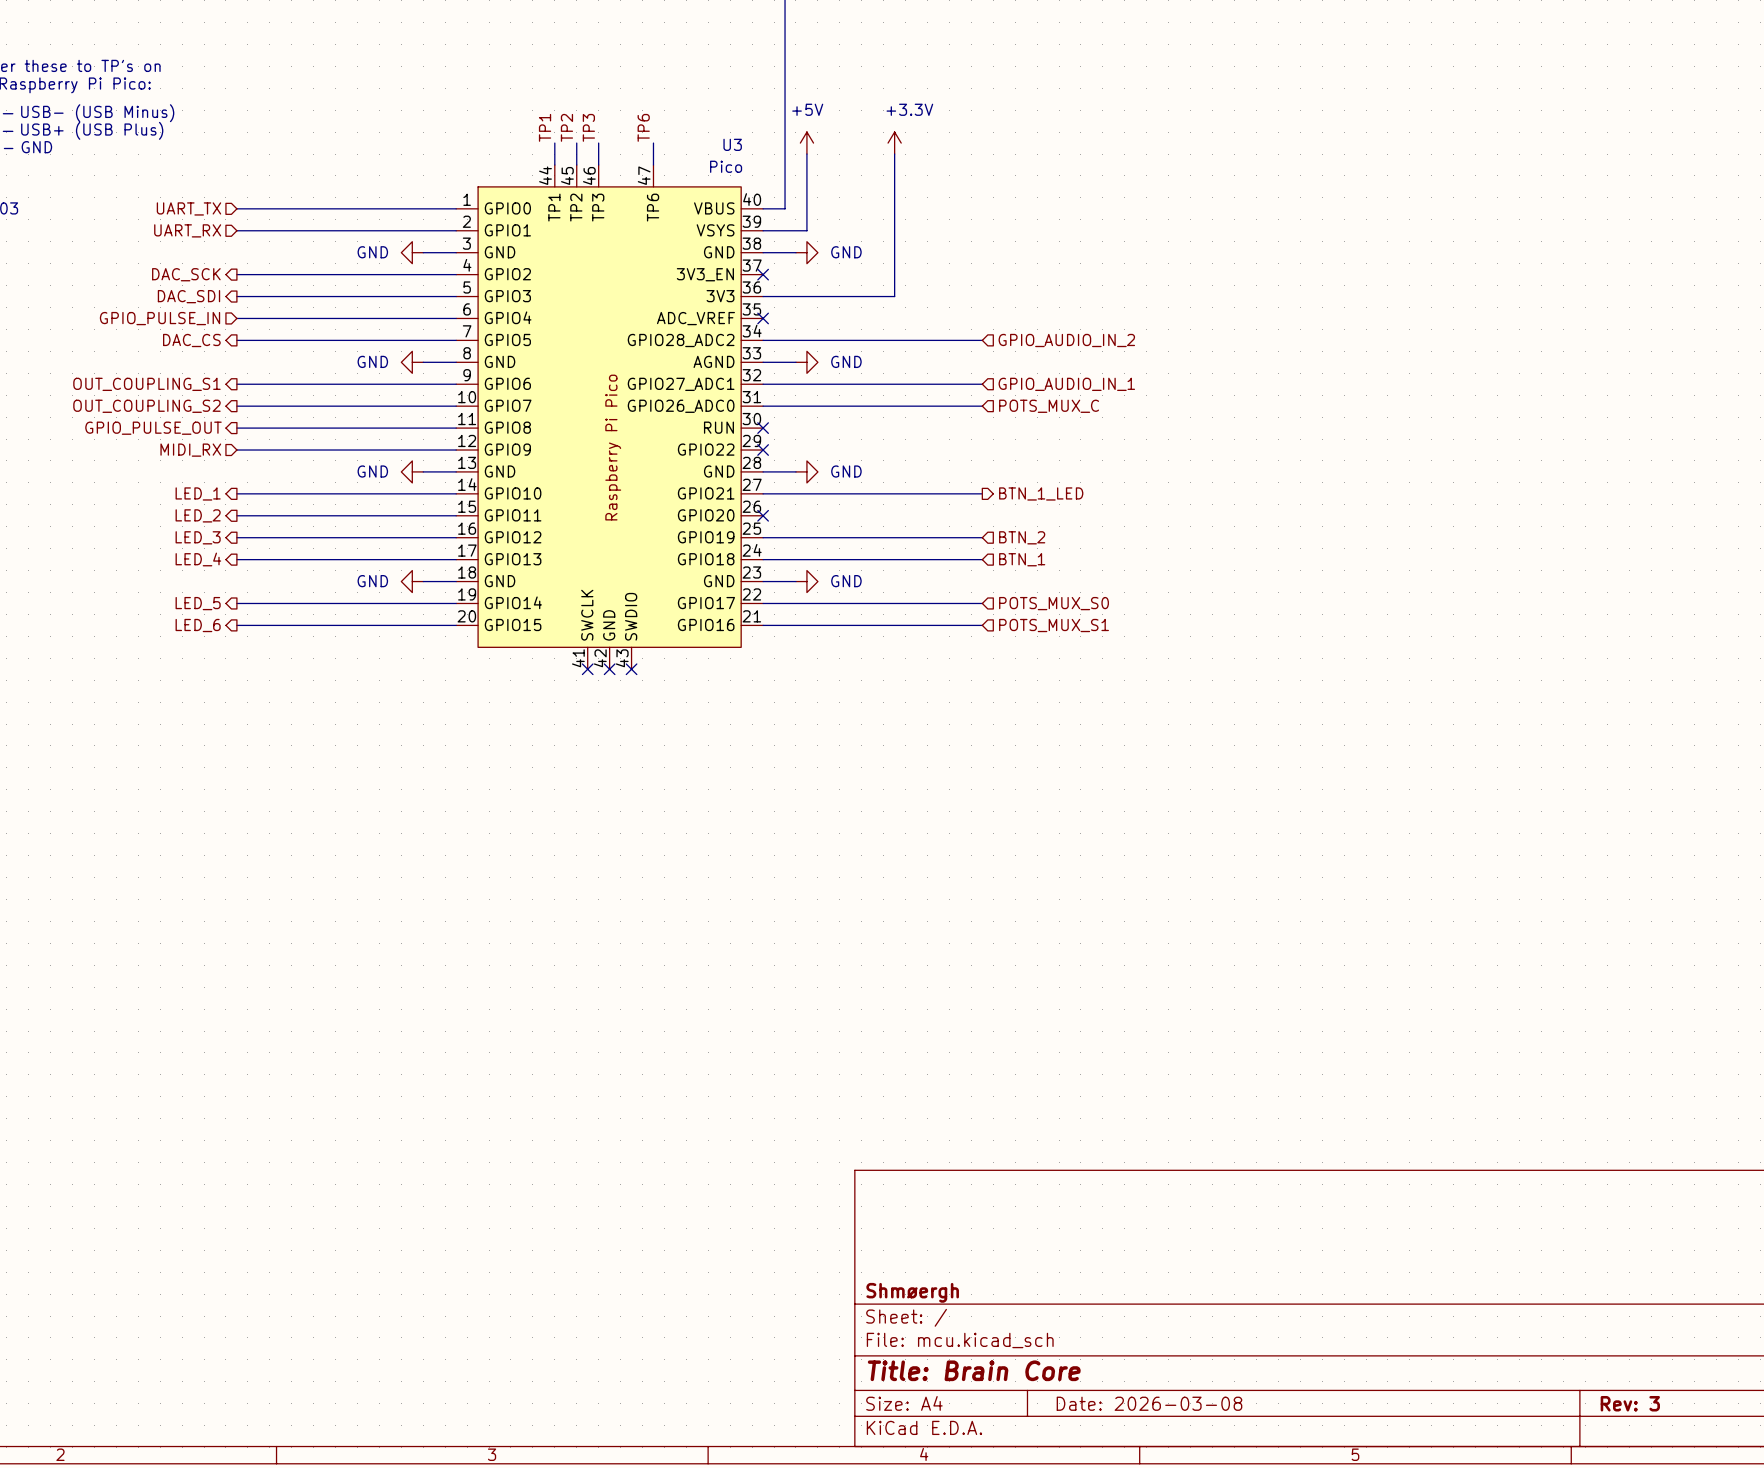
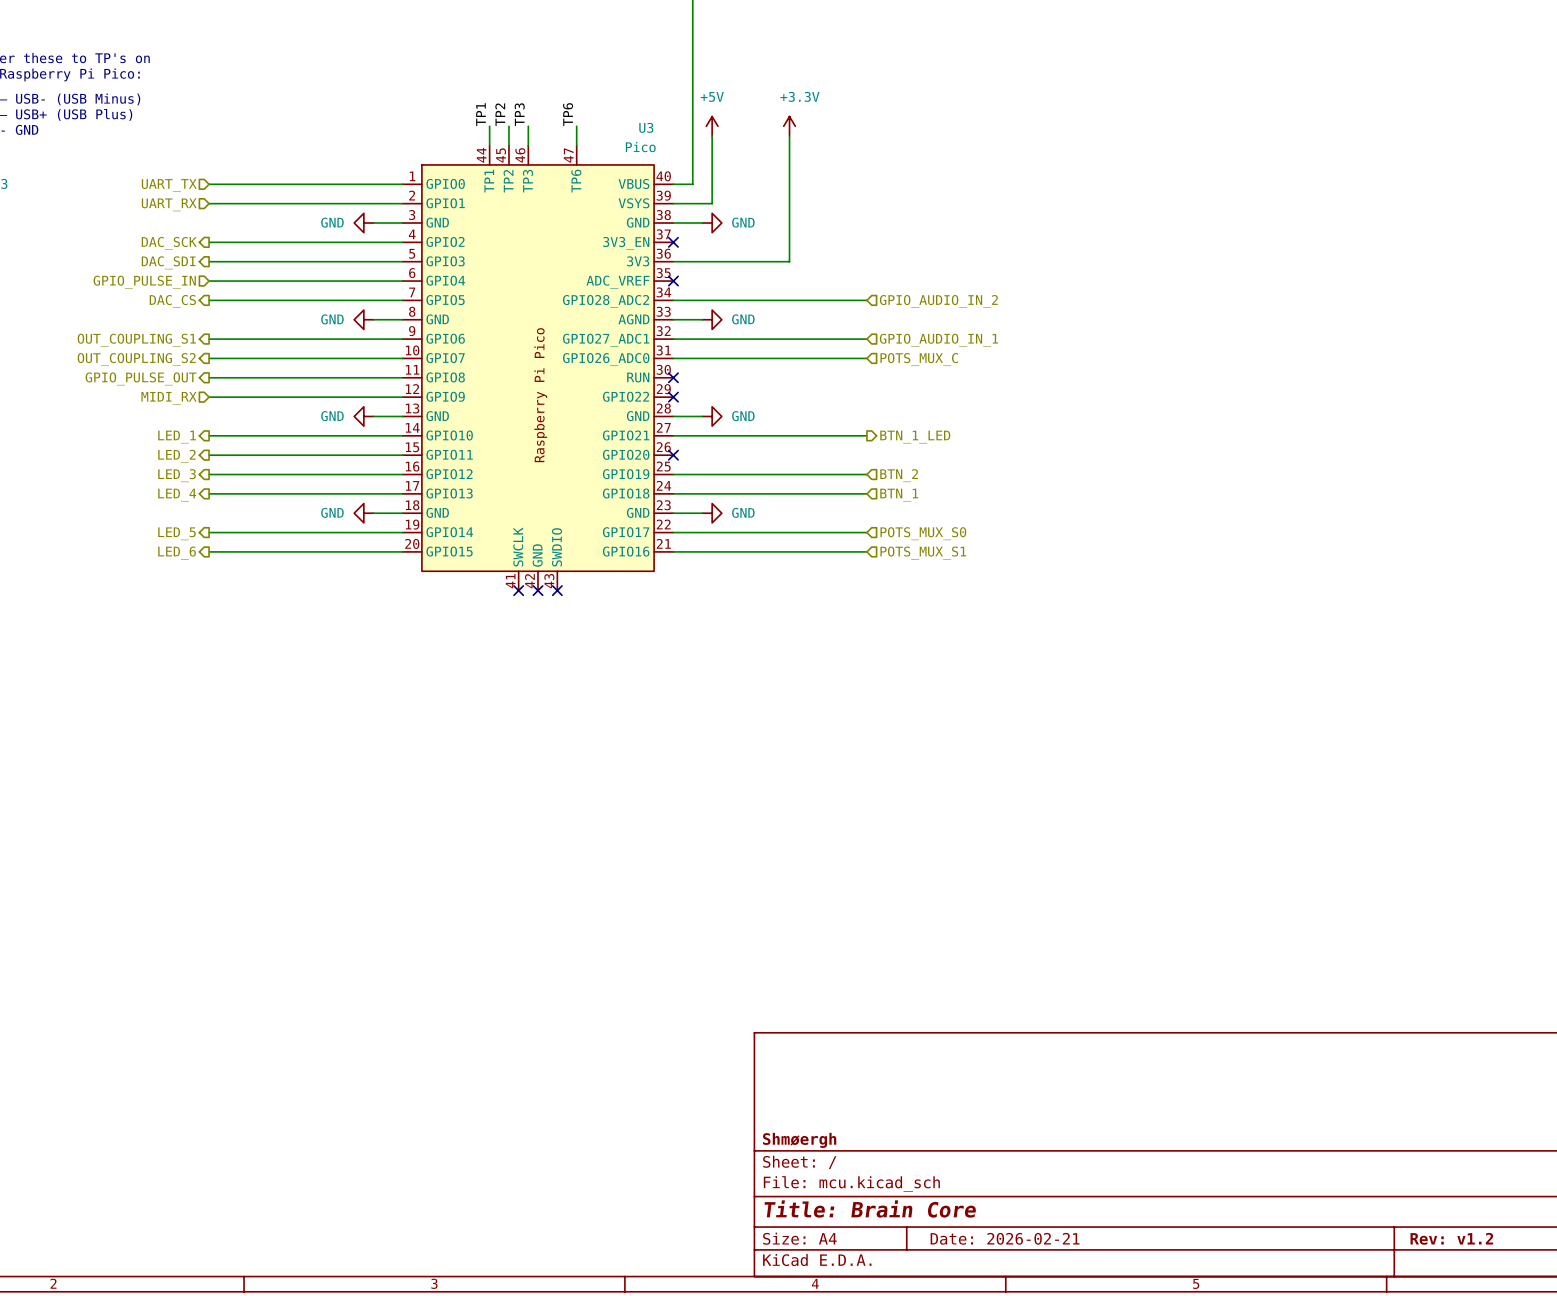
title block: Date: 2026-03-08 (1149, 1403) -> Date: 2026-02-21 (1005, 1238)
title block: Rev: 3 (1630, 1403) -> Rev: v1.2 (1451, 1238)

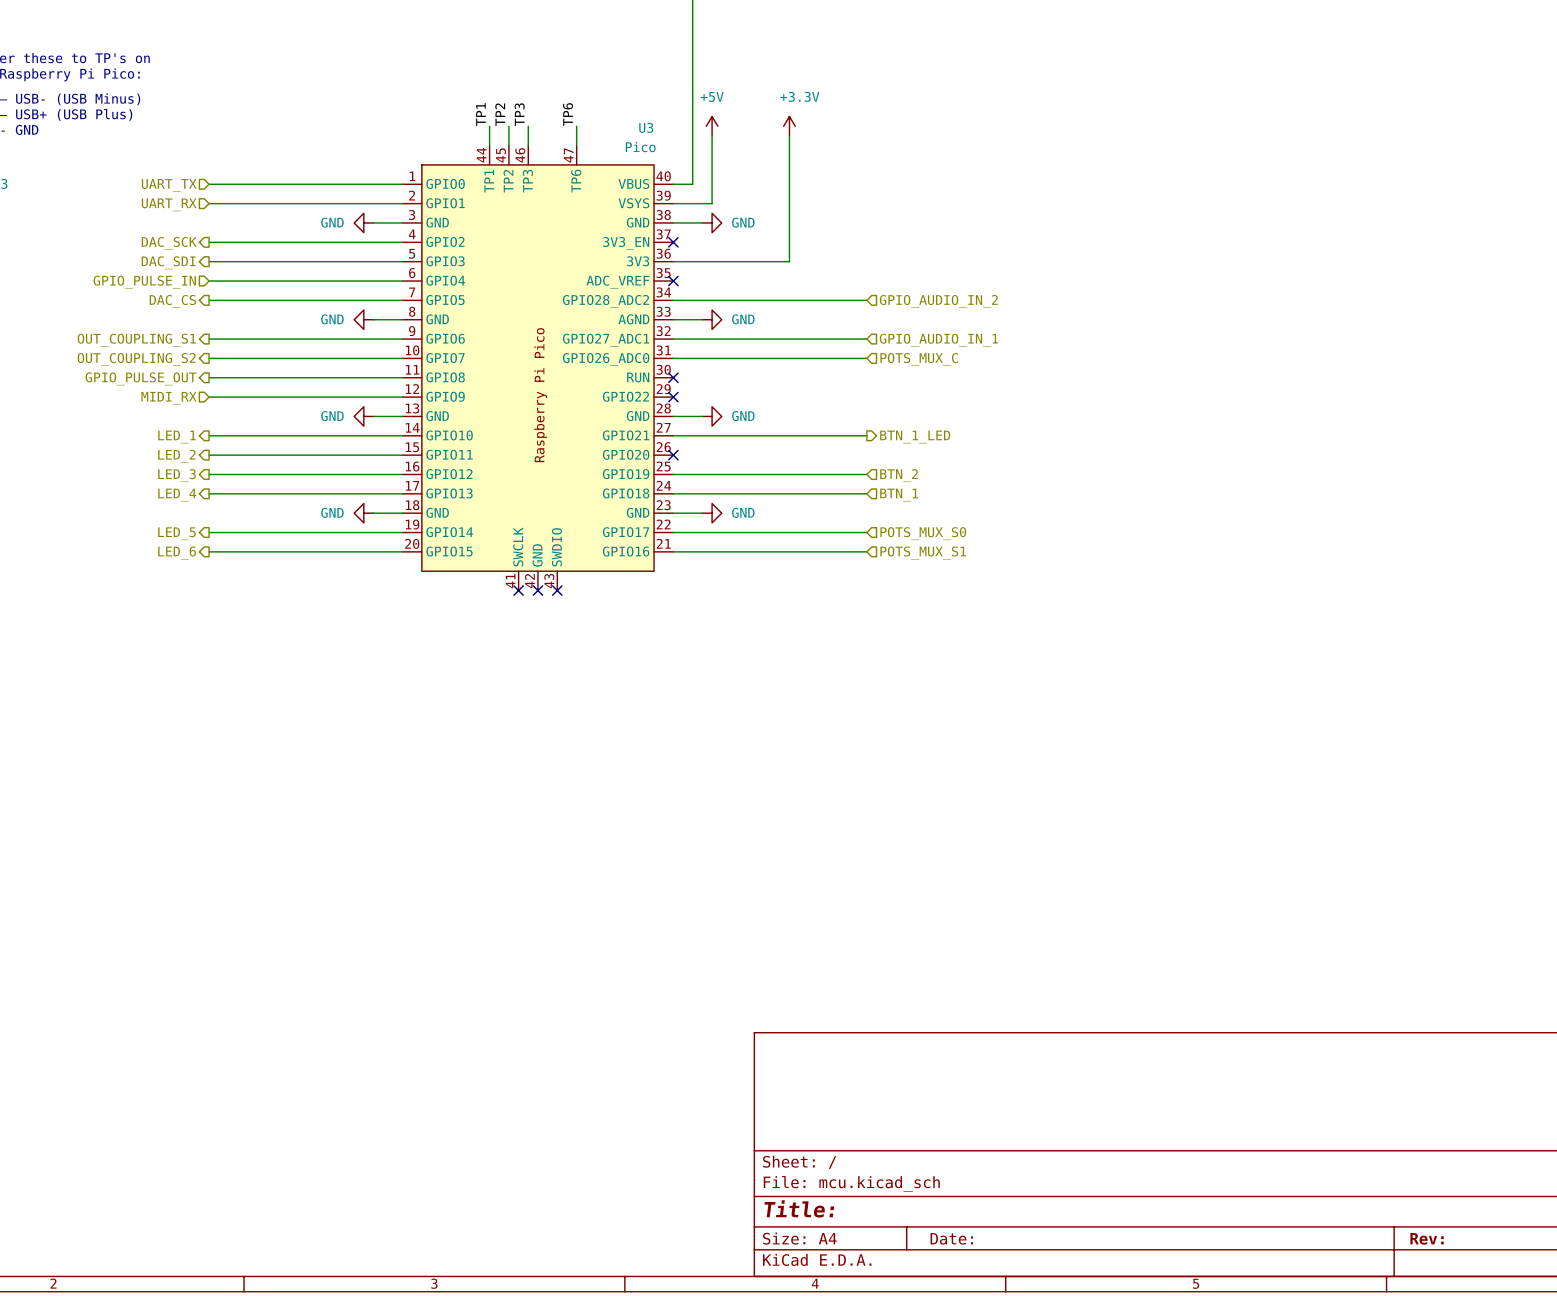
title block: Shmøergh (799, 1140) -> none
title block: Title: Brain Core (870, 1208) -> Title: (799, 1208)
title block: Date: 2026-02-21 (1005, 1238) -> Date: (951, 1238)
title block: Rev: v1.2 (1451, 1238) -> Rev: (1427, 1238)

